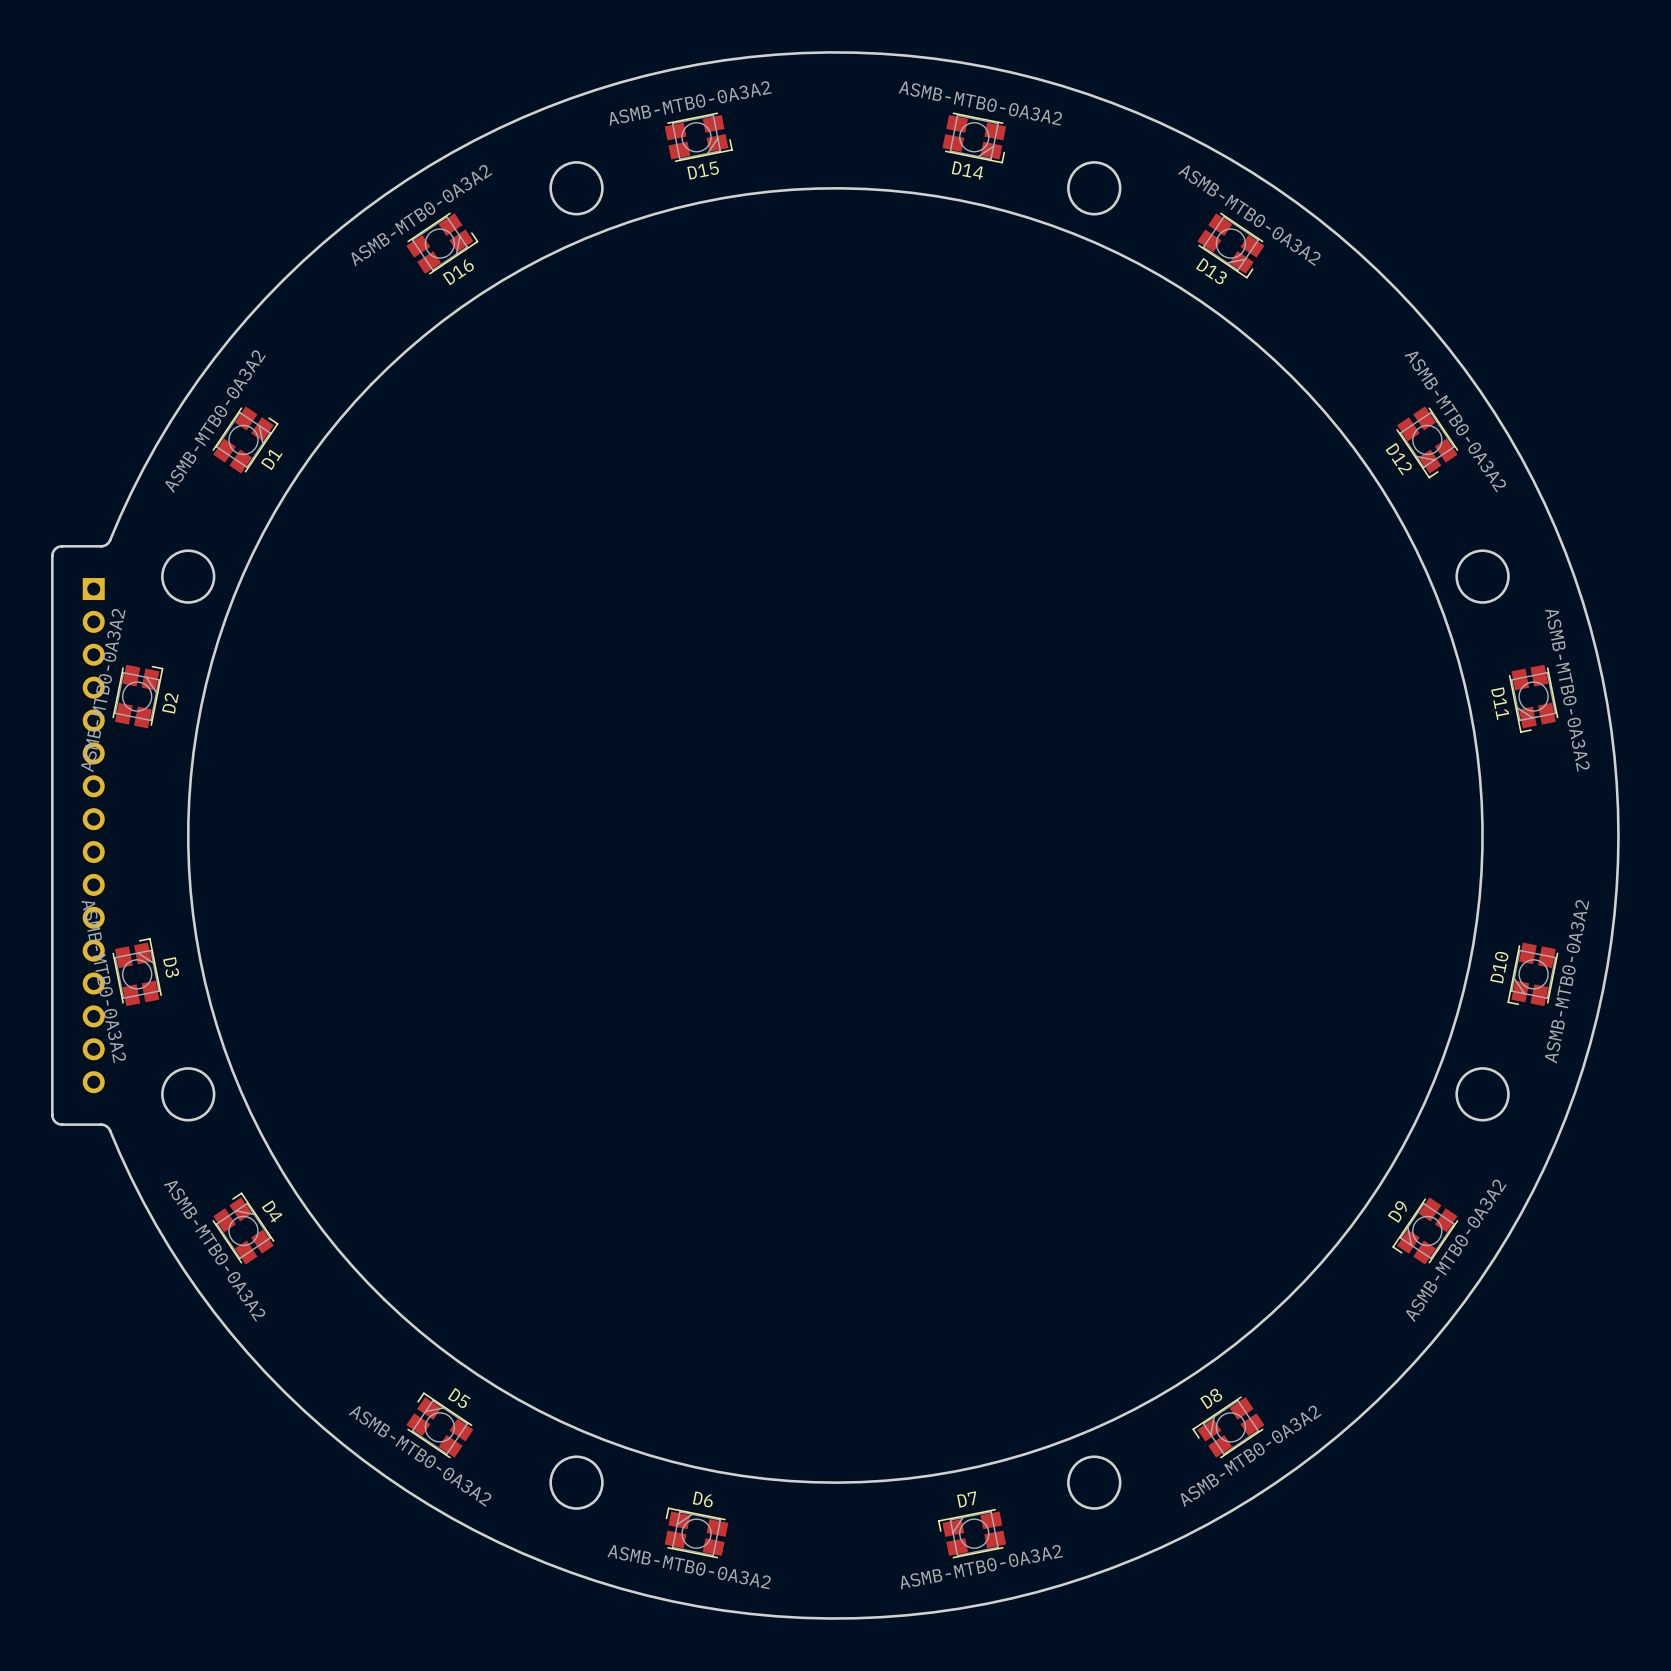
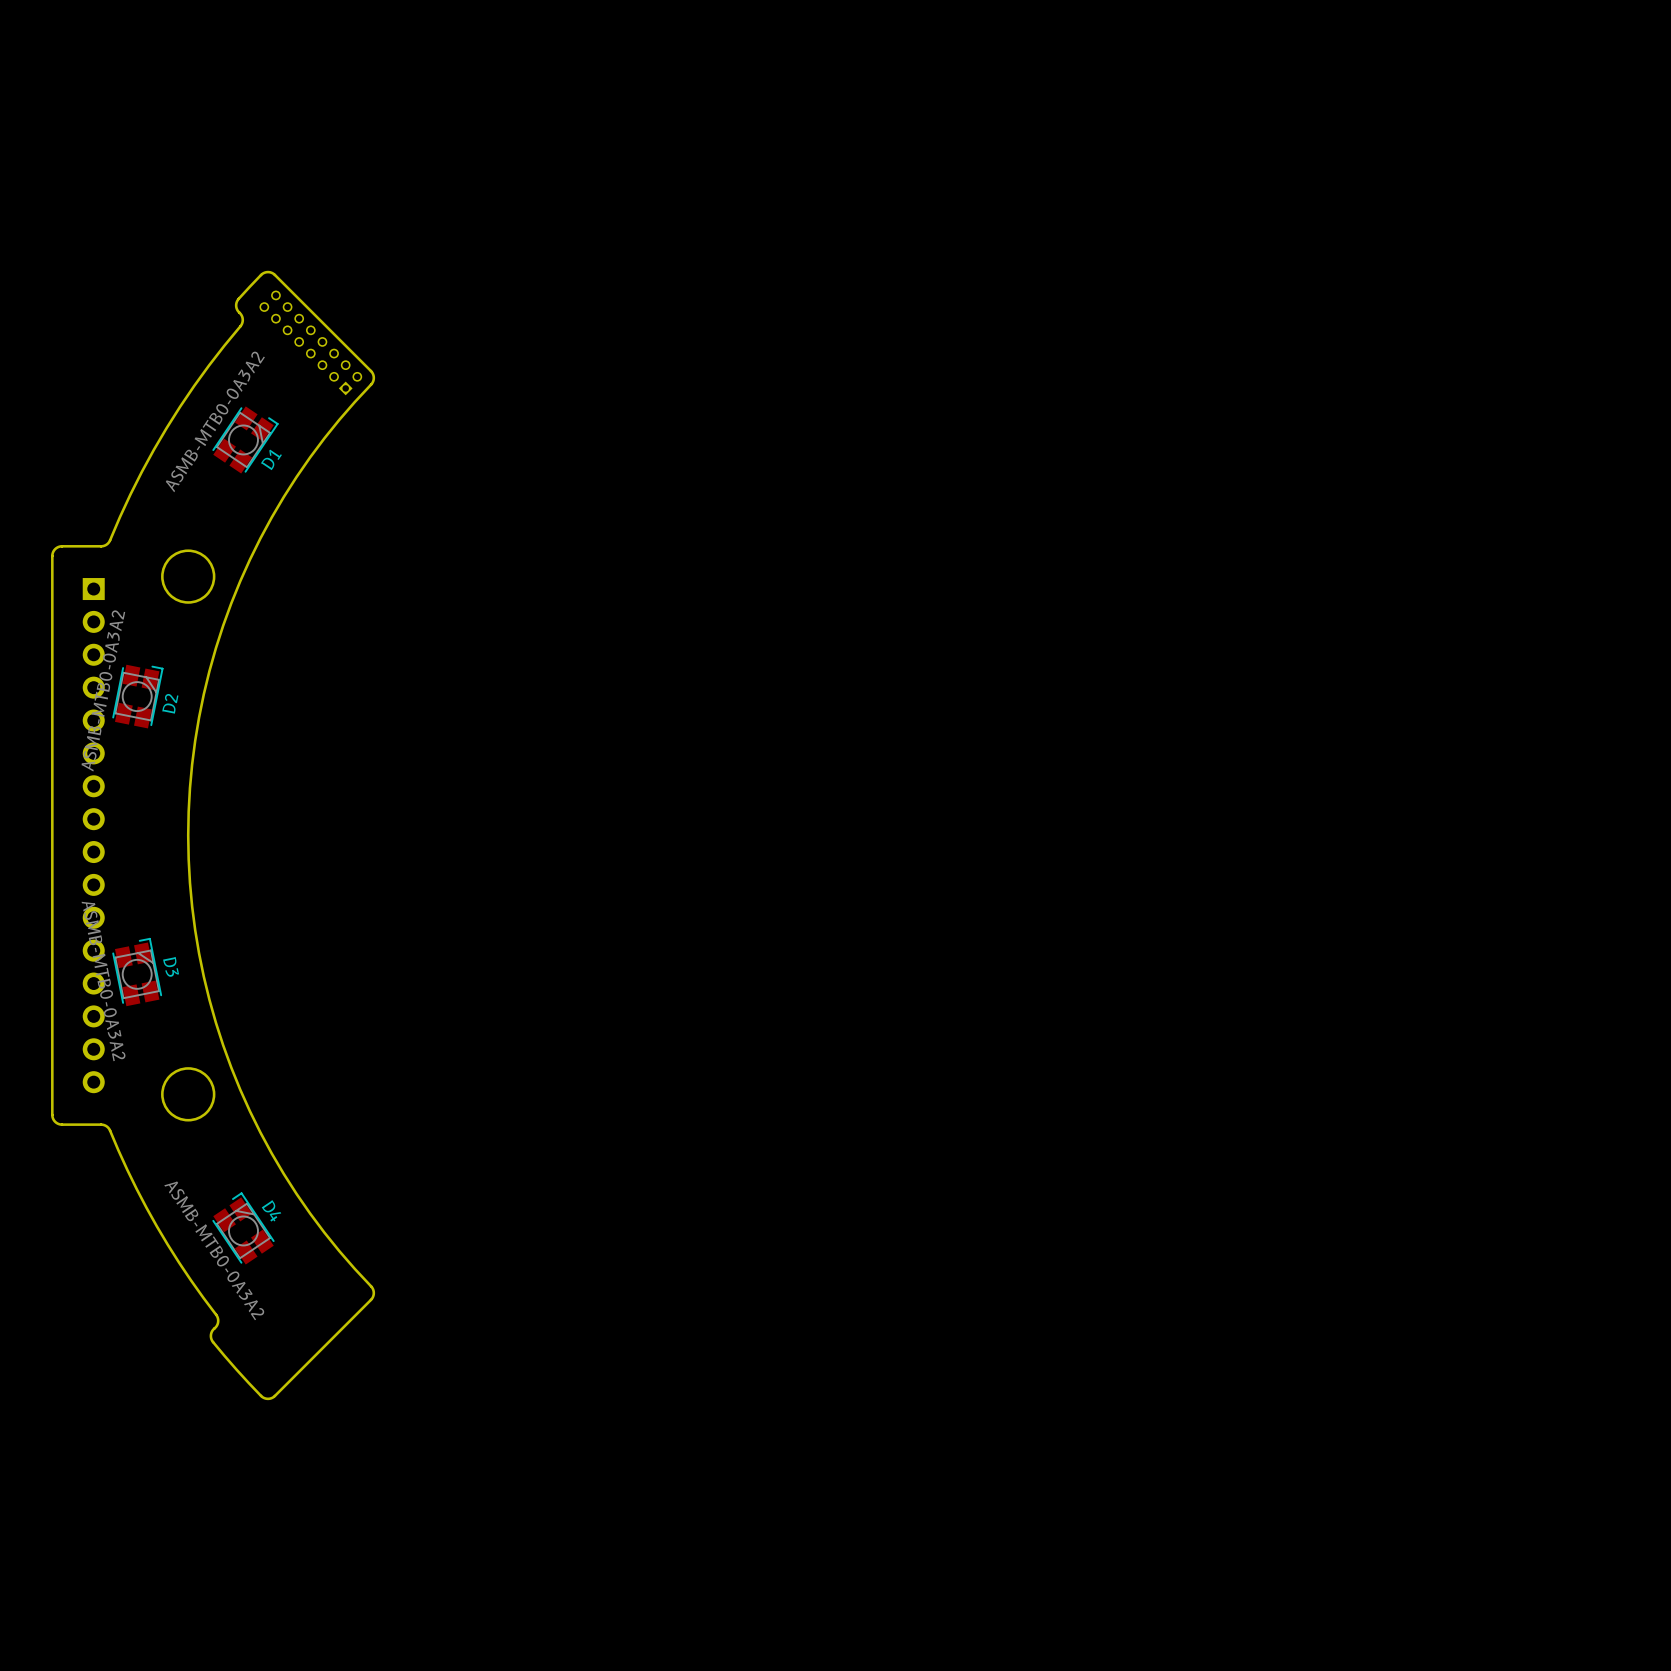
D15: ASMB-MTB0-0A3A2 (698, 137) -> none
D14: ASMB-MTB0-0A3A2 (974, 137) -> none
round board edge: [549, 161, 604, 216] -> none
round board edge: [1067, 161, 1122, 216] -> none
D16: ASMB-MTB0-0A3A2 (442, 243) -> none
D13: ASMB-MTB0-0A3A2 (1230, 245) -> none
part: none -> (310, 342)
board edge: (371, 384) (405, 351) (461, 307) (501, 281) (564, 247) (630, 221) (699, 202) (770, 191) (817, 188) (889, 190) (960, 200) (1006, 211) (1074, 233) (1117, 253) (1180, 287) (1238, 329) (1291, 376) (1339, 429) (1381, 487) (1416, 550) (1435, 593) (1451, 638) (1469, 707) (1477, 754) (1482, 825) (1479, 897) (1473, 944) (1463, 991) (1442, 1059) (1414, 1124) (1378, 1187) (1336, 1244) (1305, 1280) (1271, 1313) (1215, 1359) (1155, 1397) (1091, 1429) (1024, 1454) (955, 1471) (908, 1478) (837, 1482) (789, 1481) (718, 1471) (649, 1455) (604, 1439) (538, 1410) (497, 1387) (438, 1346) (384, 1299) (337, 1248) (296, 1193) (272, 1153) (241, 1091) (217, 1026) (200, 959) (193, 914) (188, 845) (190, 775) (201, 707) (218, 640) (233, 596) (262, 533) (298, 474) (325, 436) (371, 384) -> none
D12: ASMB-MTB0-0A3A2 (1427, 442) -> none
board edge: (110, 540) (131, 492) (169, 423) (198, 379) (247, 317) (284, 279) (342, 226) (406, 180) (474, 140) (546, 107) (595, 89) (672, 69) (724, 60) (776, 54) (855, 52) (933, 58) (985, 66) (1037, 78) (1112, 102) (1160, 123) (1230, 159) (1296, 202) (1358, 252) (1396, 288) (1448, 347) (1494, 412) (1521, 457) (1555, 528) (1574, 577) (1596, 652) (1607, 704) (1616, 782) (1618, 835) (1616, 888) (1607, 966) (1596, 1017) (1574, 1093) (1555, 1142) (1521, 1213) (1494, 1258) (1448, 1322) (1396, 1382) (1358, 1418) (1296, 1468) (1230, 1511) (1160, 1547) (1112, 1567) (1037, 1592) (985, 1603) (933, 1612) (855, 1618) (776, 1616) (724, 1610) (672, 1601) (595, 1581) (546, 1563) (474, 1530) (406, 1490) (342, 1444) (284, 1391) (247, 1353) (198, 1291) (169, 1247) (131, 1178) (110, 1130) -> (110, 540) (141, 471) (166, 428) (194, 385) (241, 324) (242, 316) (236, 307) (237, 300) (261, 274) (267, 272) (273, 273) (370, 371) (373, 377) (371, 383) (339, 419) (296, 476) (271, 517) (249, 559) (231, 603) (215, 648) (203, 694) (192, 764) (188, 835) (192, 906) (203, 976) (223, 1045) (249, 1111) (283, 1173) (324, 1232) (371, 1287) (373, 1291) (370, 1299) (273, 1397) (266, 1398) (261, 1395) (212, 1341) (211, 1333) (217, 1324) (217, 1317) (179, 1262) (156, 1226) (136, 1188) (110, 1130)
round board edge: [1455, 549, 1510, 604] -> none
D11: ASMB-MTB0-0A3A2 (1533, 698) -> none
D10: ASMB-MTB0-0A3A2 (1532, 974) -> none
round board edge: [1455, 1067, 1510, 1122] -> none
D9: ASMB-MTB0-0A3A2 (1425, 1230) -> none
D5: ASMB-MTB0-0A3A2 (439, 1425) -> none
D8: ASMB-MTB0-0A3A2 (1228, 1427) -> none
round board edge: [549, 1455, 604, 1510] -> none
round board edge: [1067, 1455, 1122, 1510] -> none
D6: ASMB-MTB0-0A3A2 (696, 1532) -> none
D7: ASMB-MTB0-0A3A2 (972, 1533) -> none

